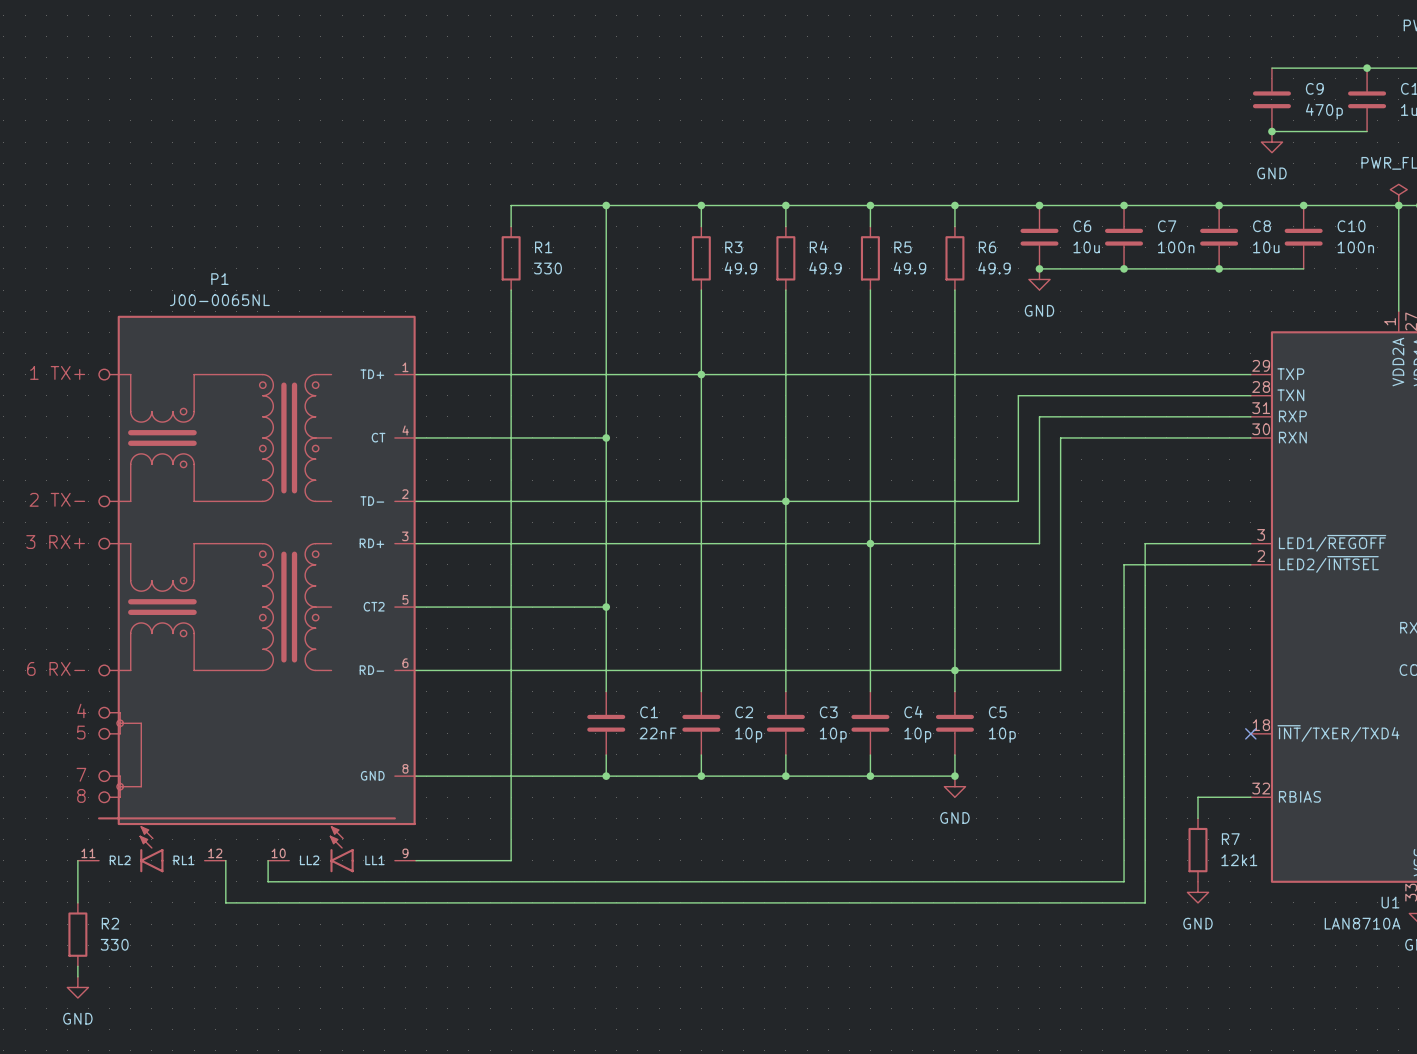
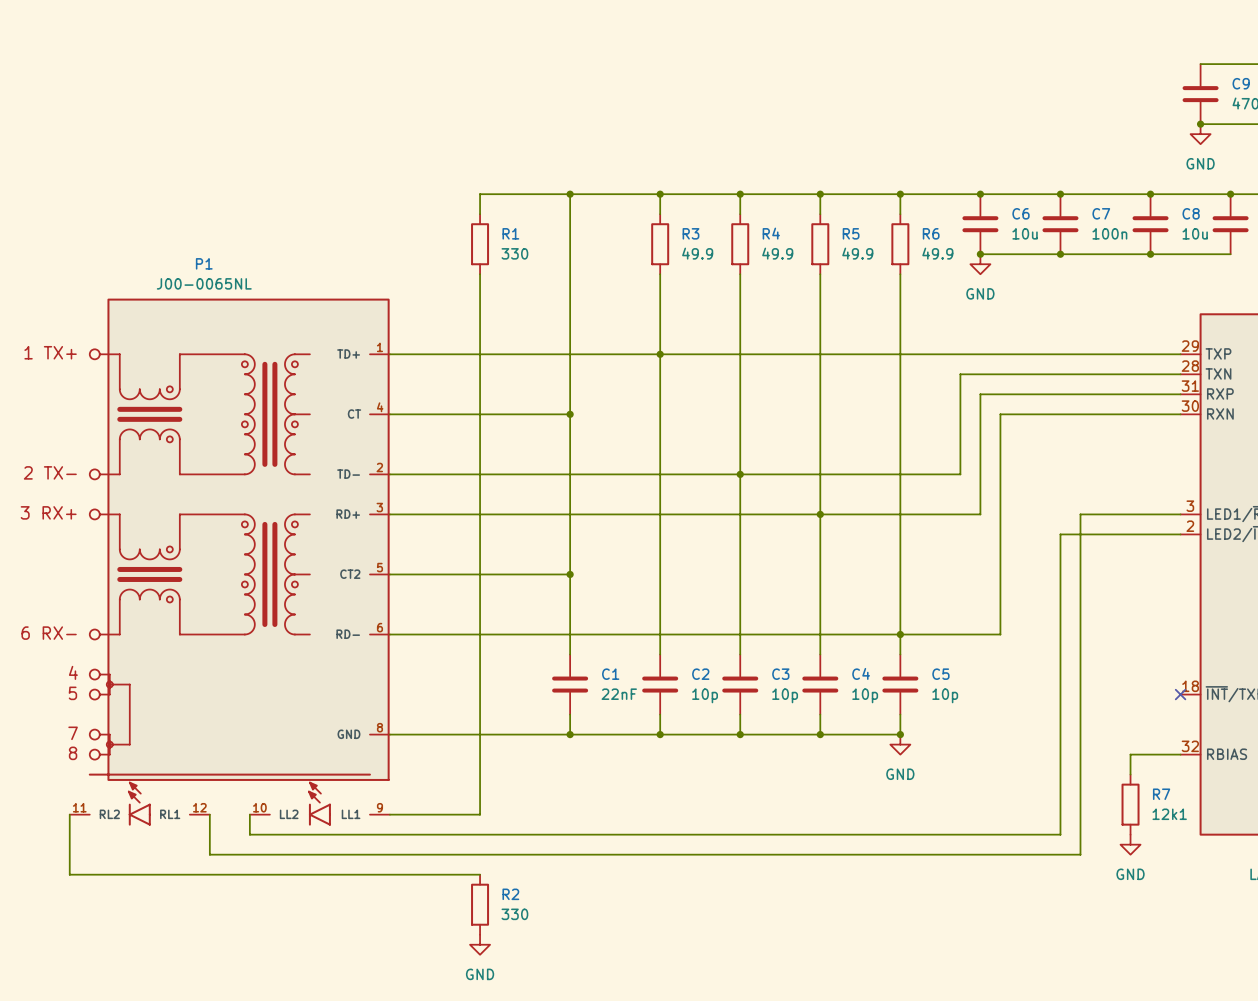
wire: none -> (69, 854) (69, 874) (480, 874)
R2 position: (77, 934) -> (480, 904)
wire: (77, 966) (77, 976) -> none
power symbol: GND (77, 987) -> none
power symbol: none -> GND (480, 944)

